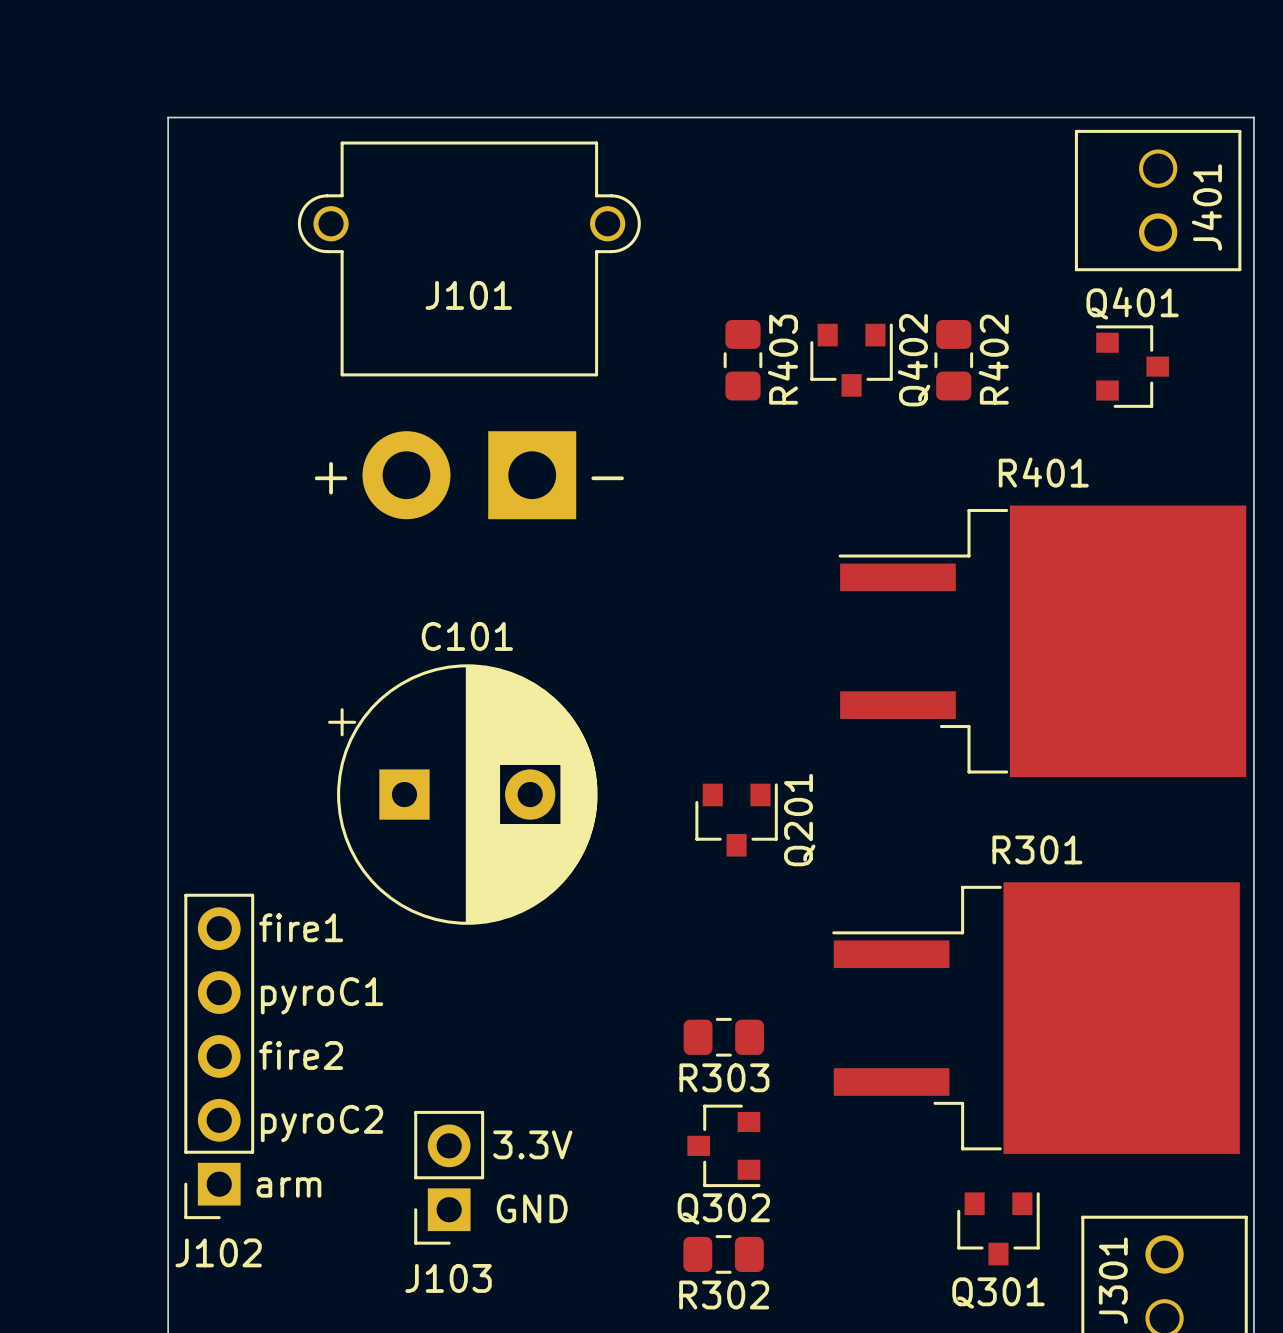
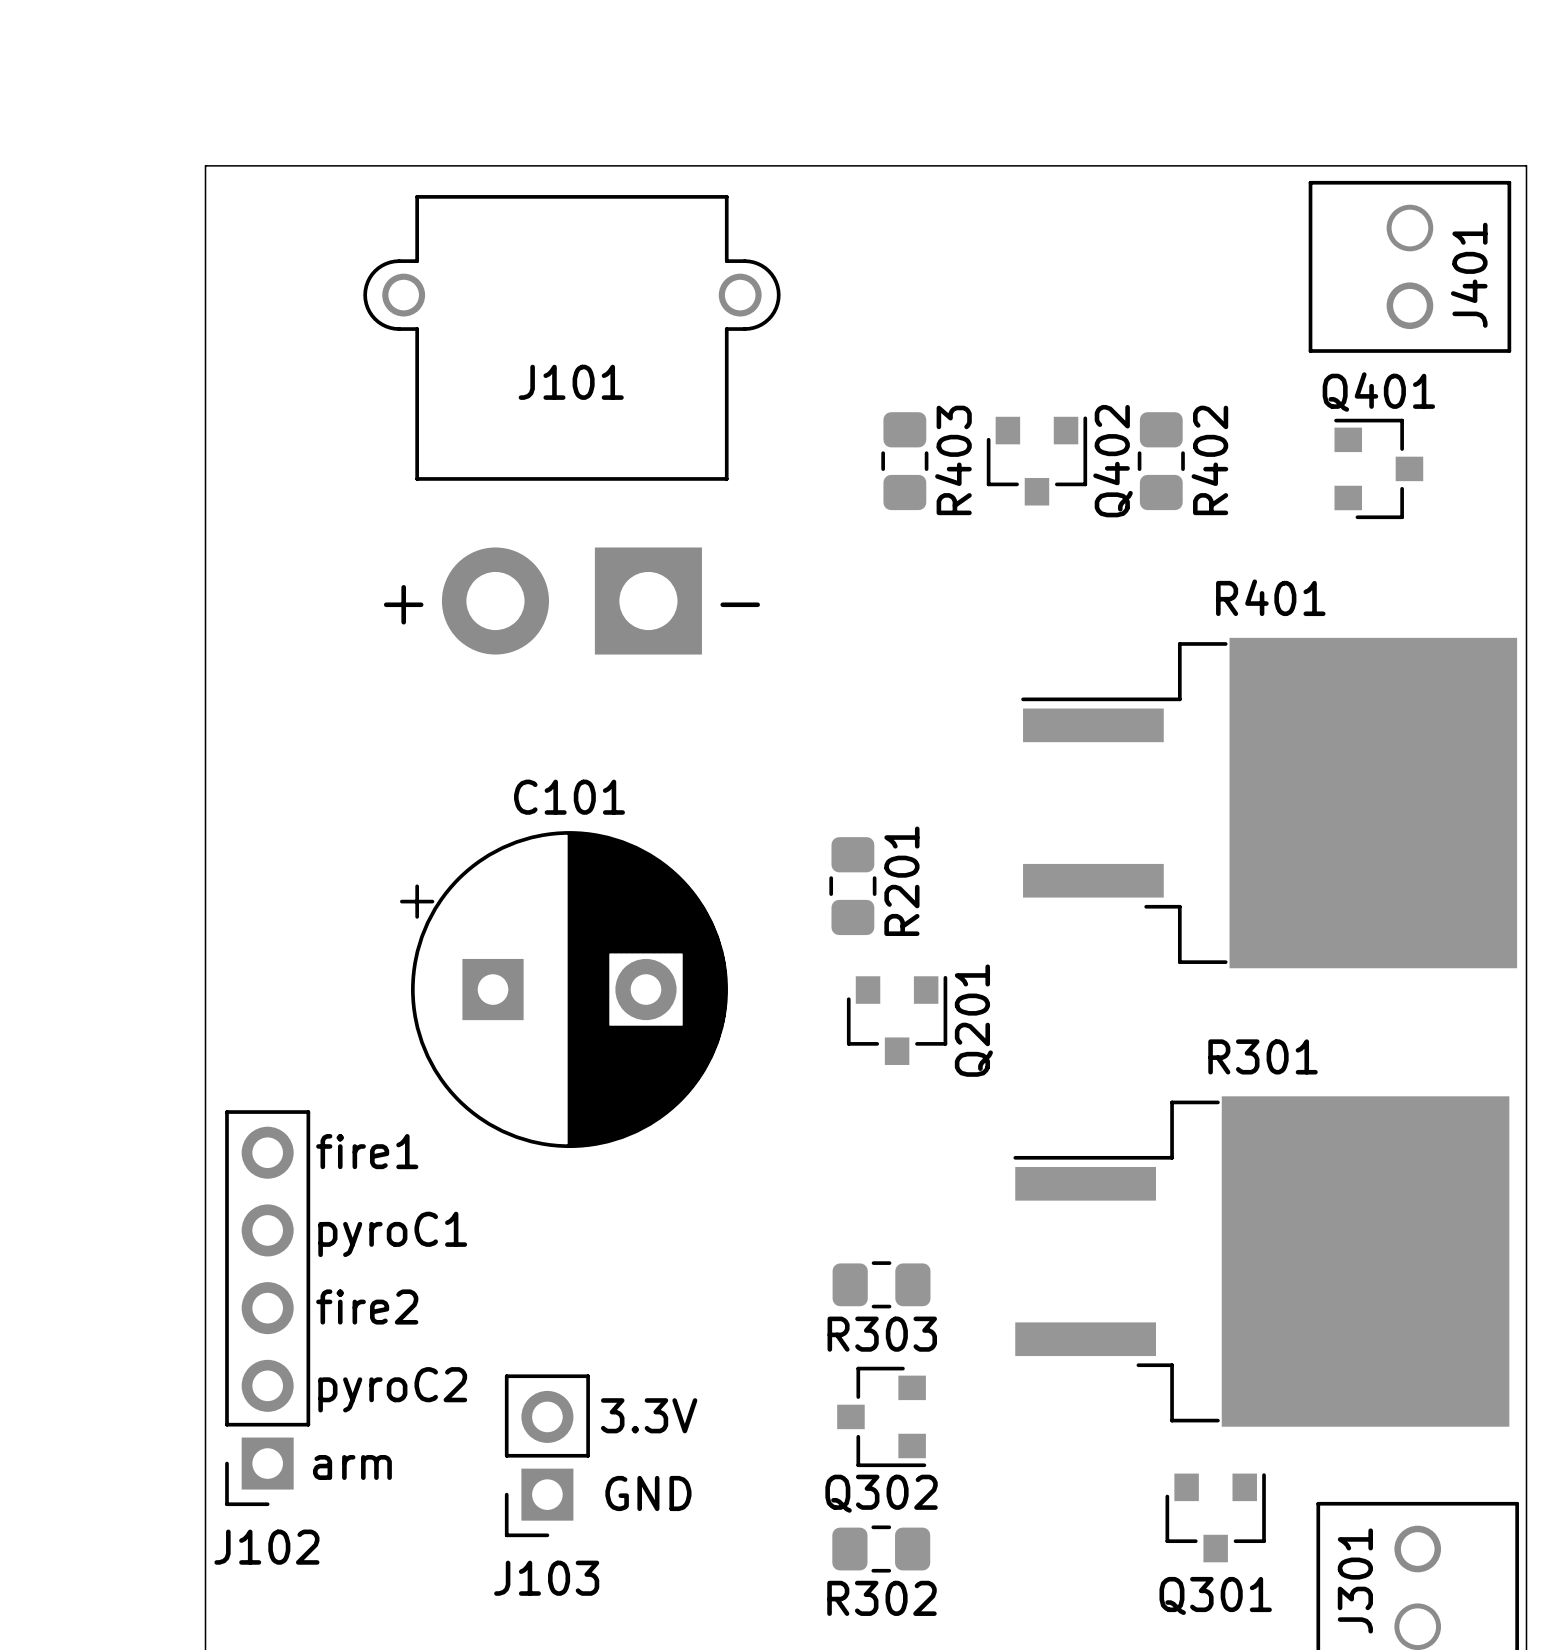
R201: none -> (852, 886)

